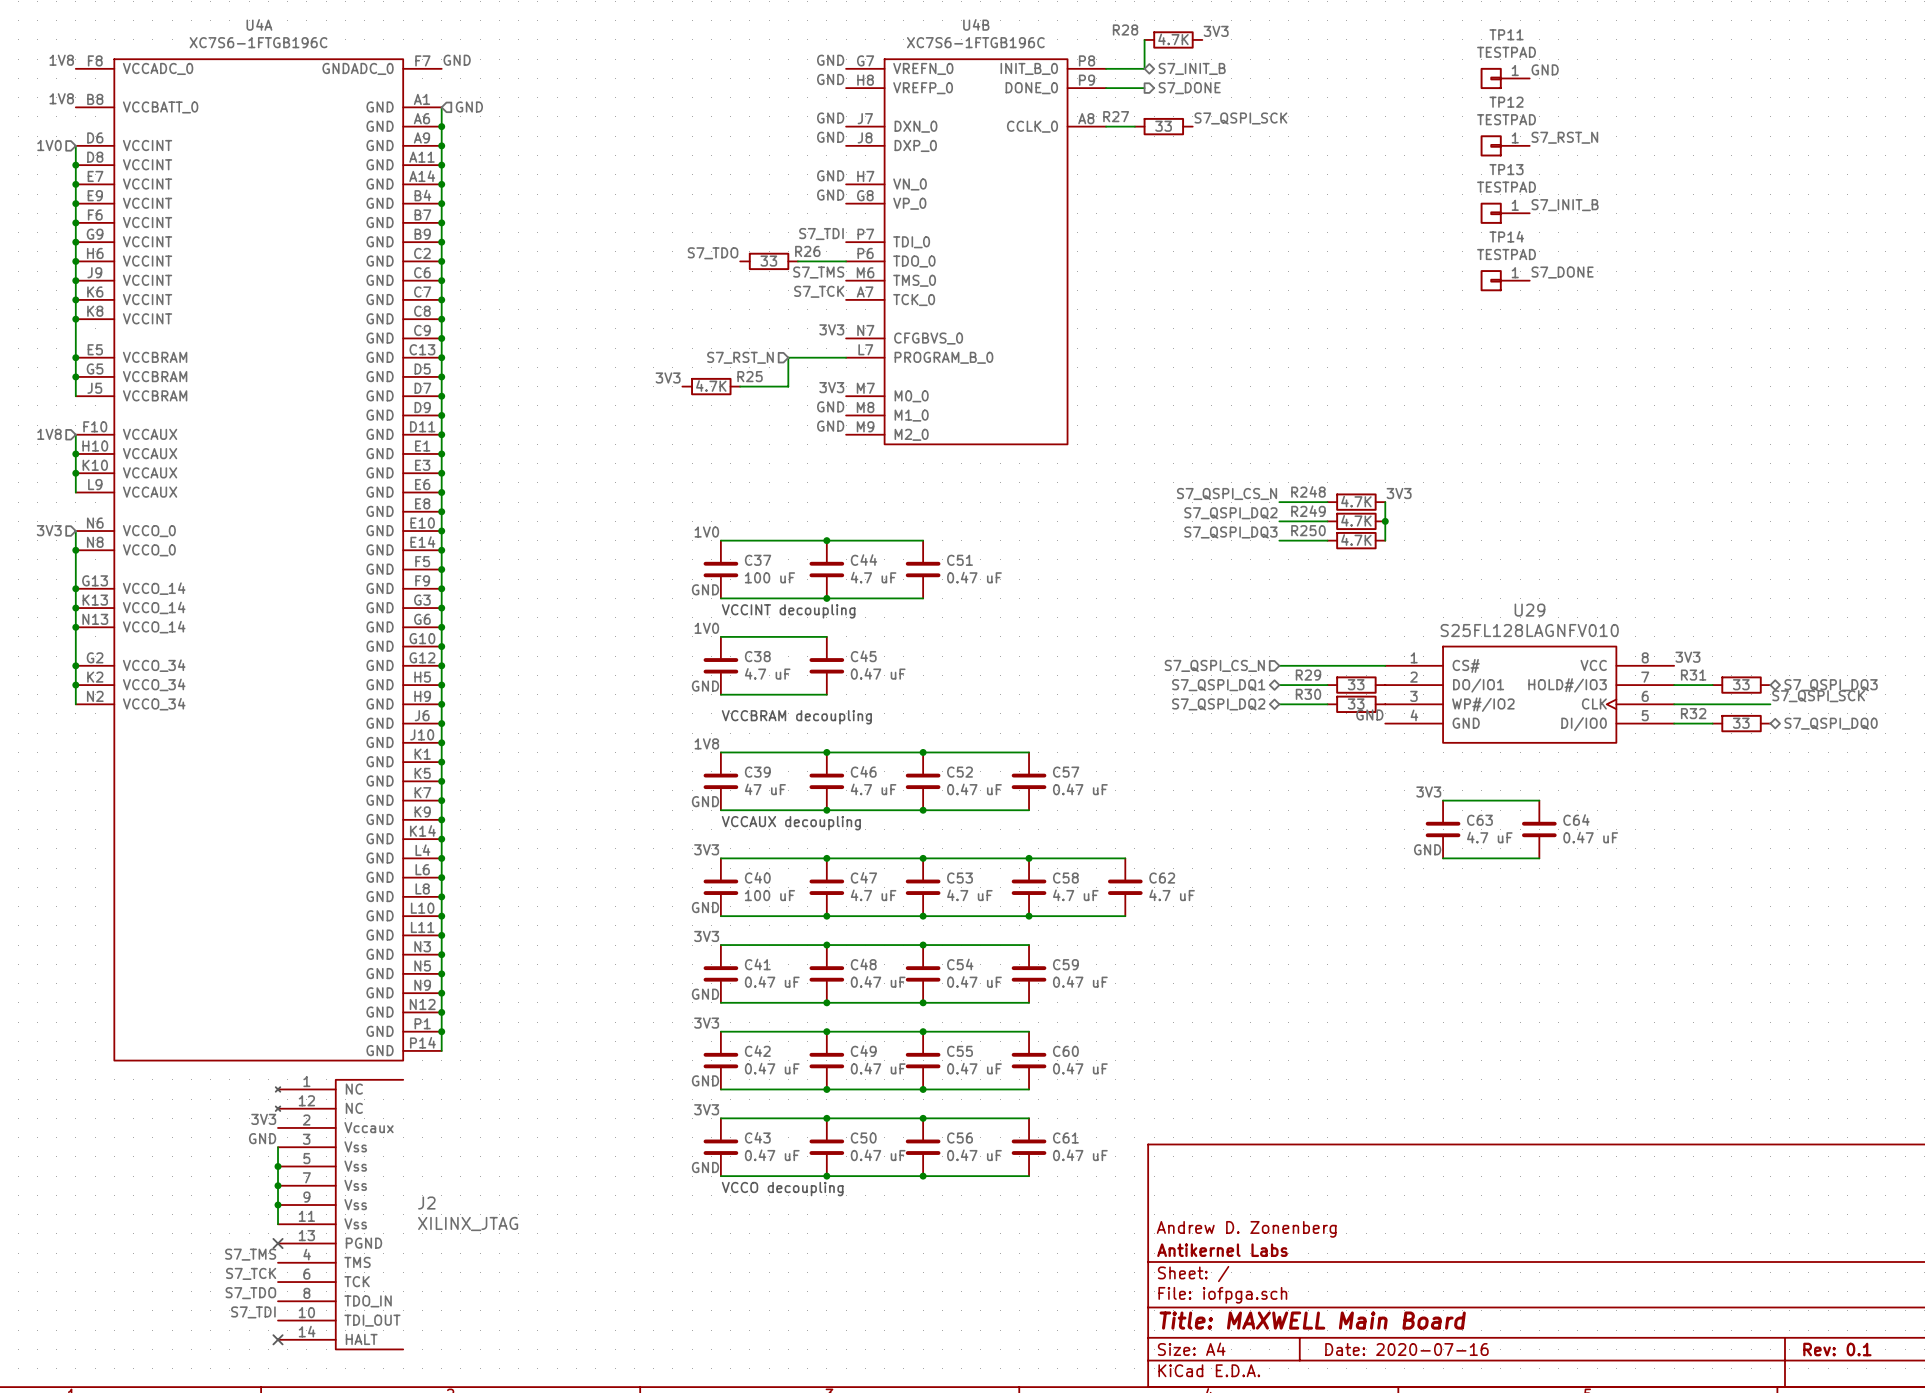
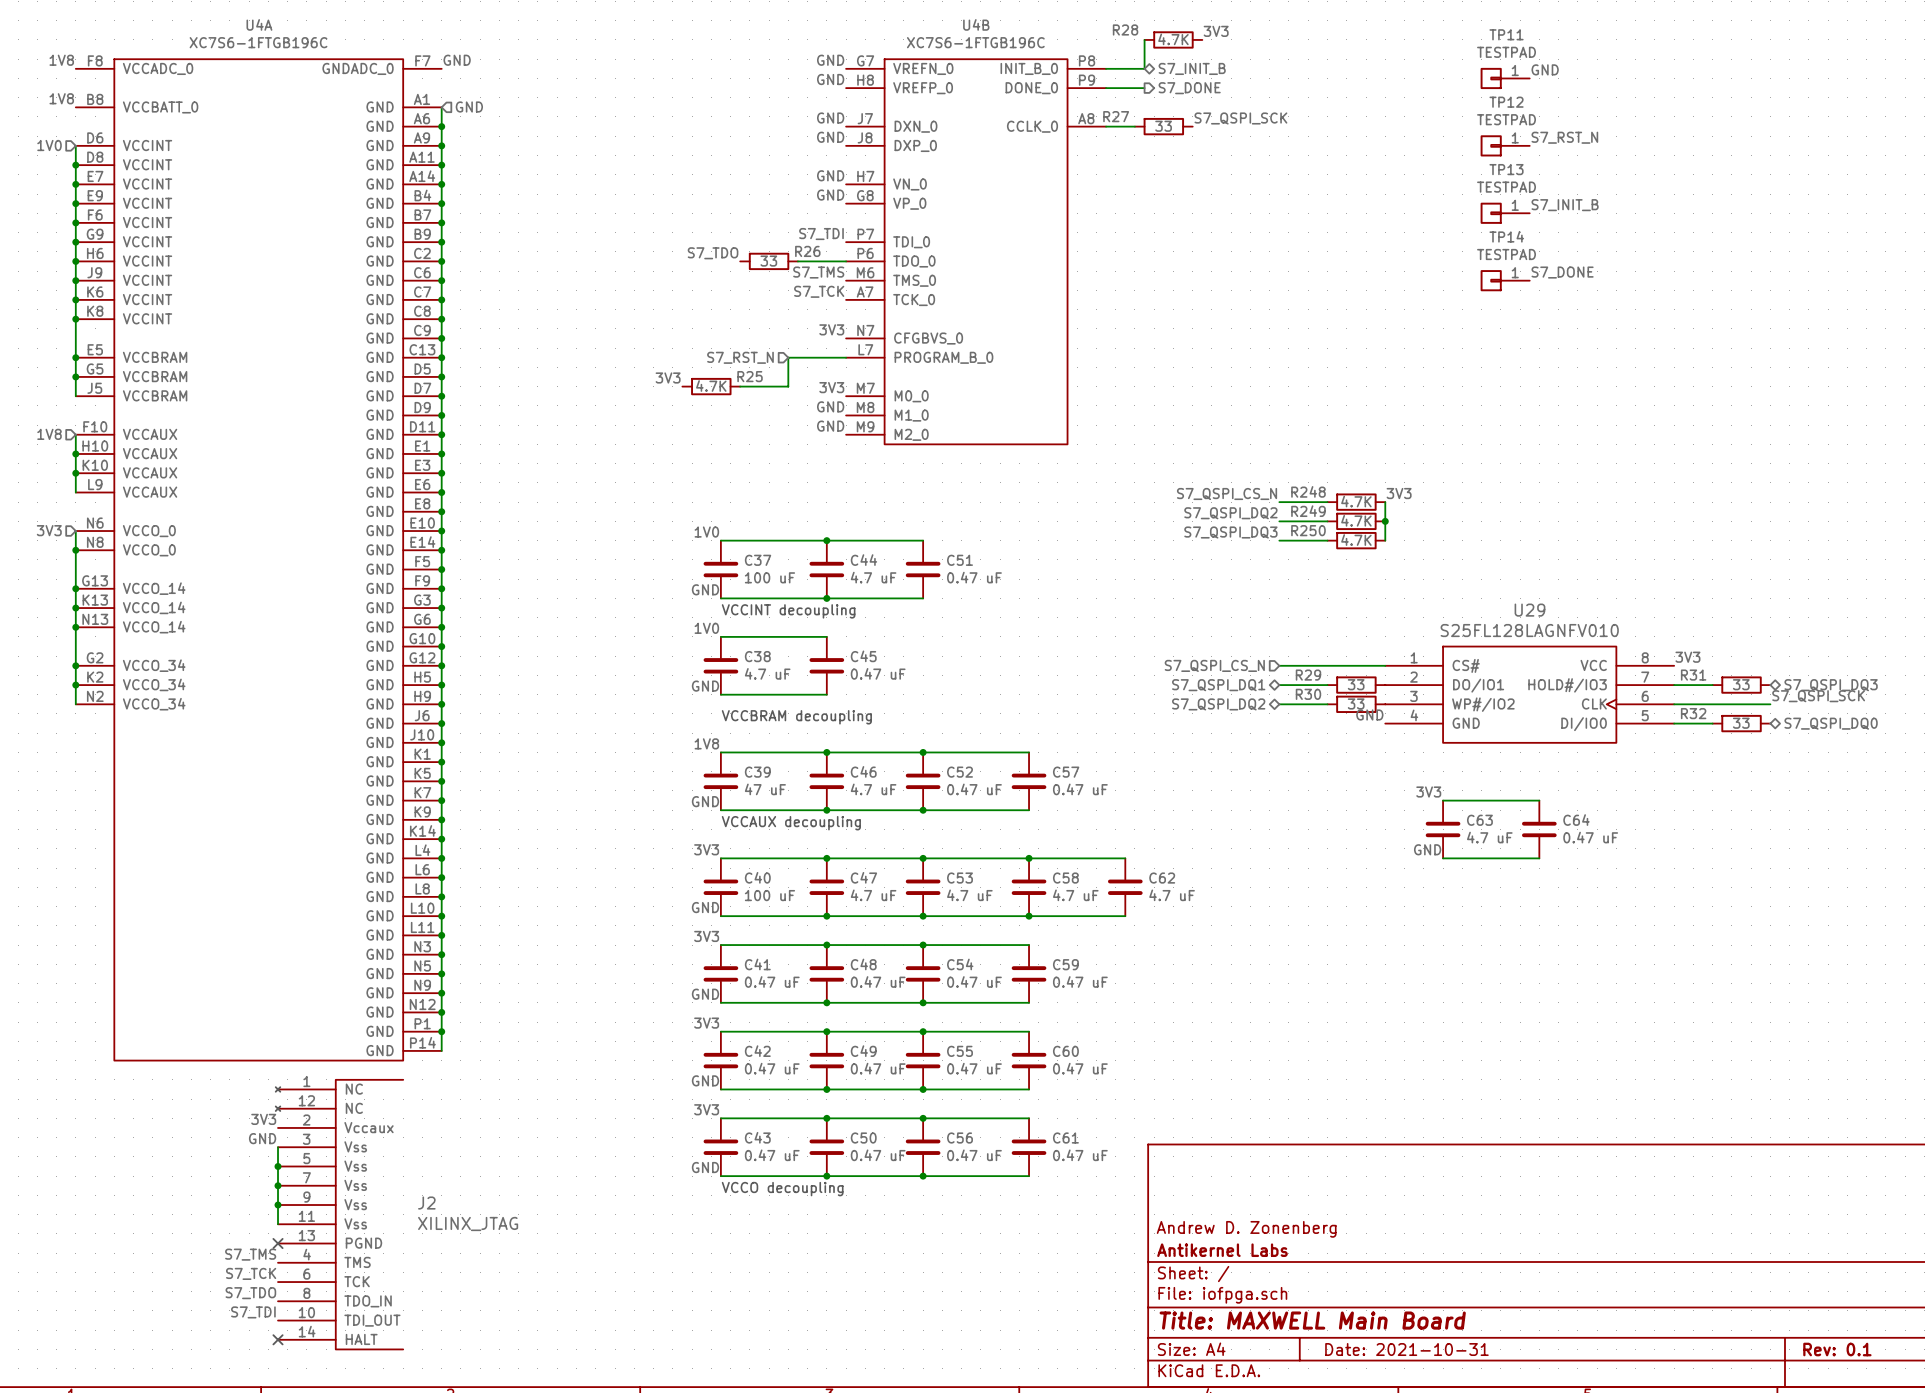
title block: Date: 2020-07-16 (1406, 1349) -> Date: 2021-10-31 (1406, 1349)

